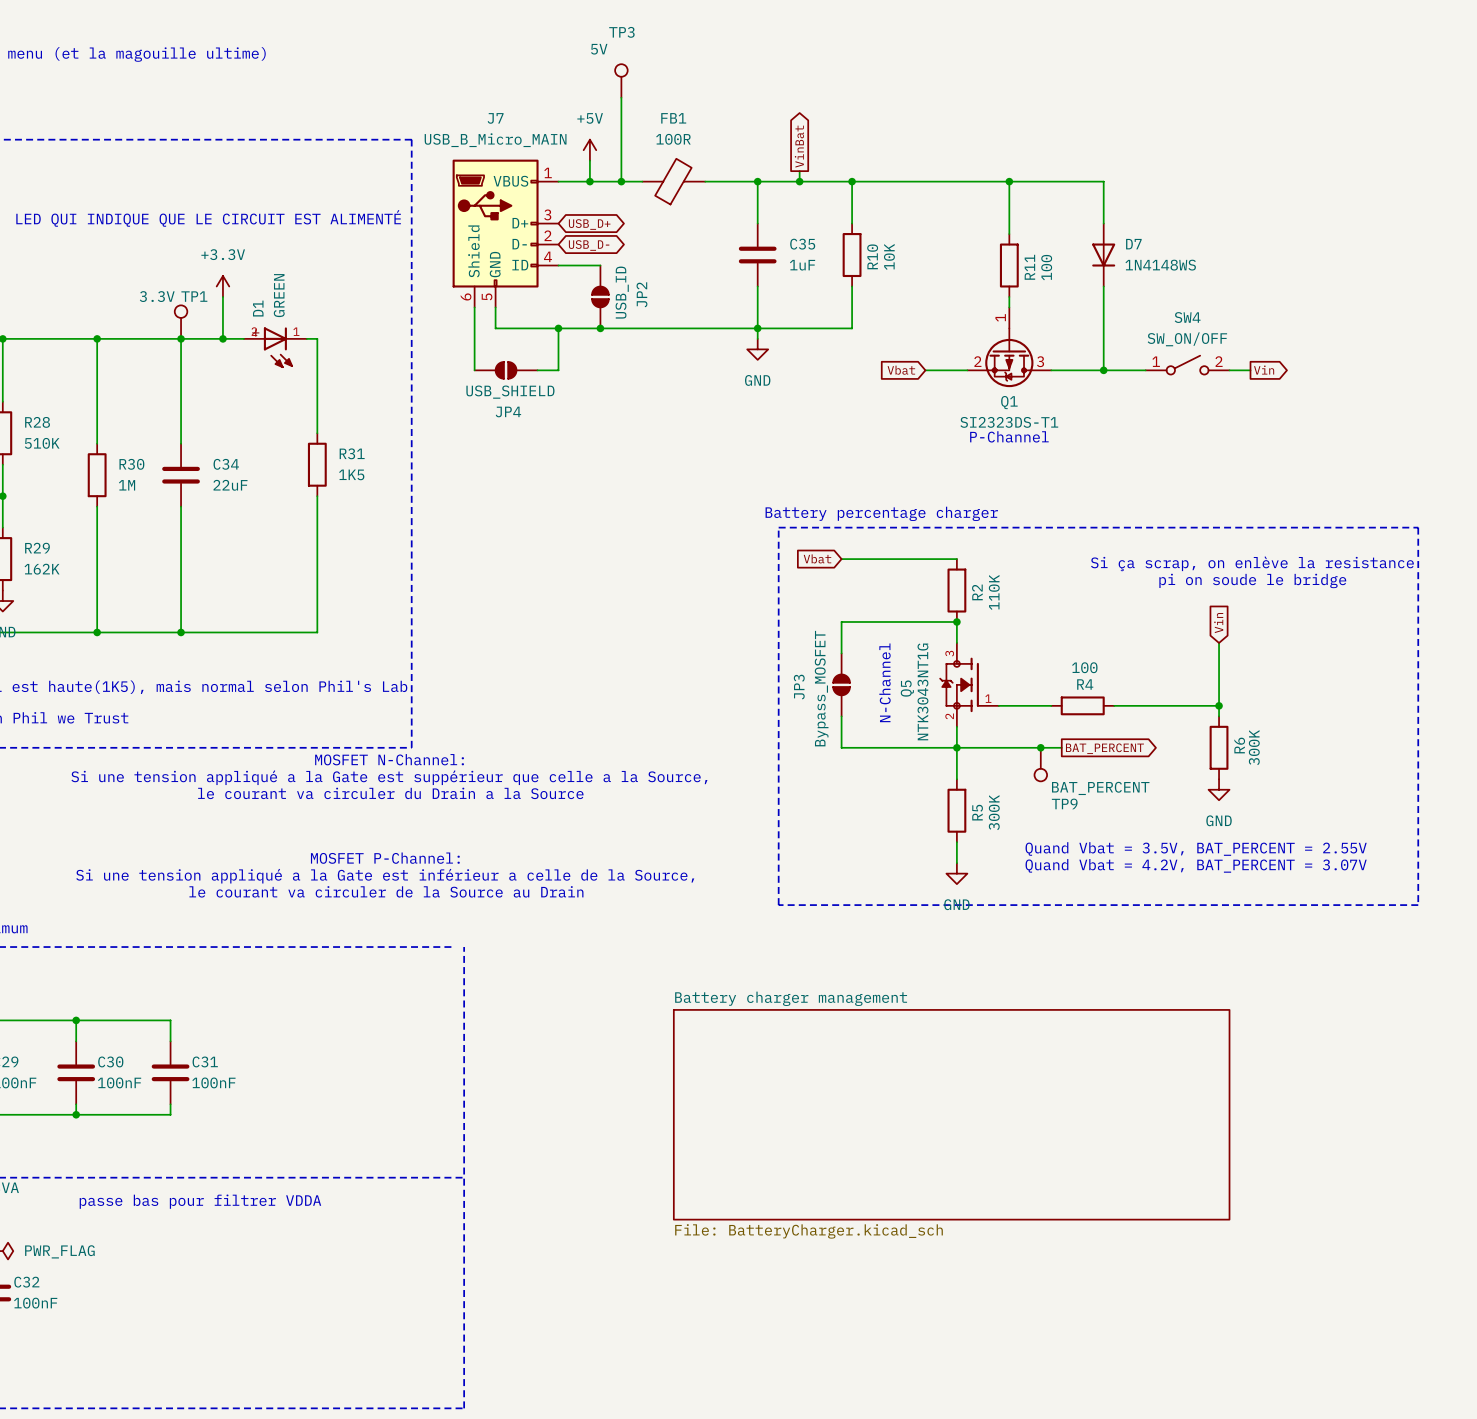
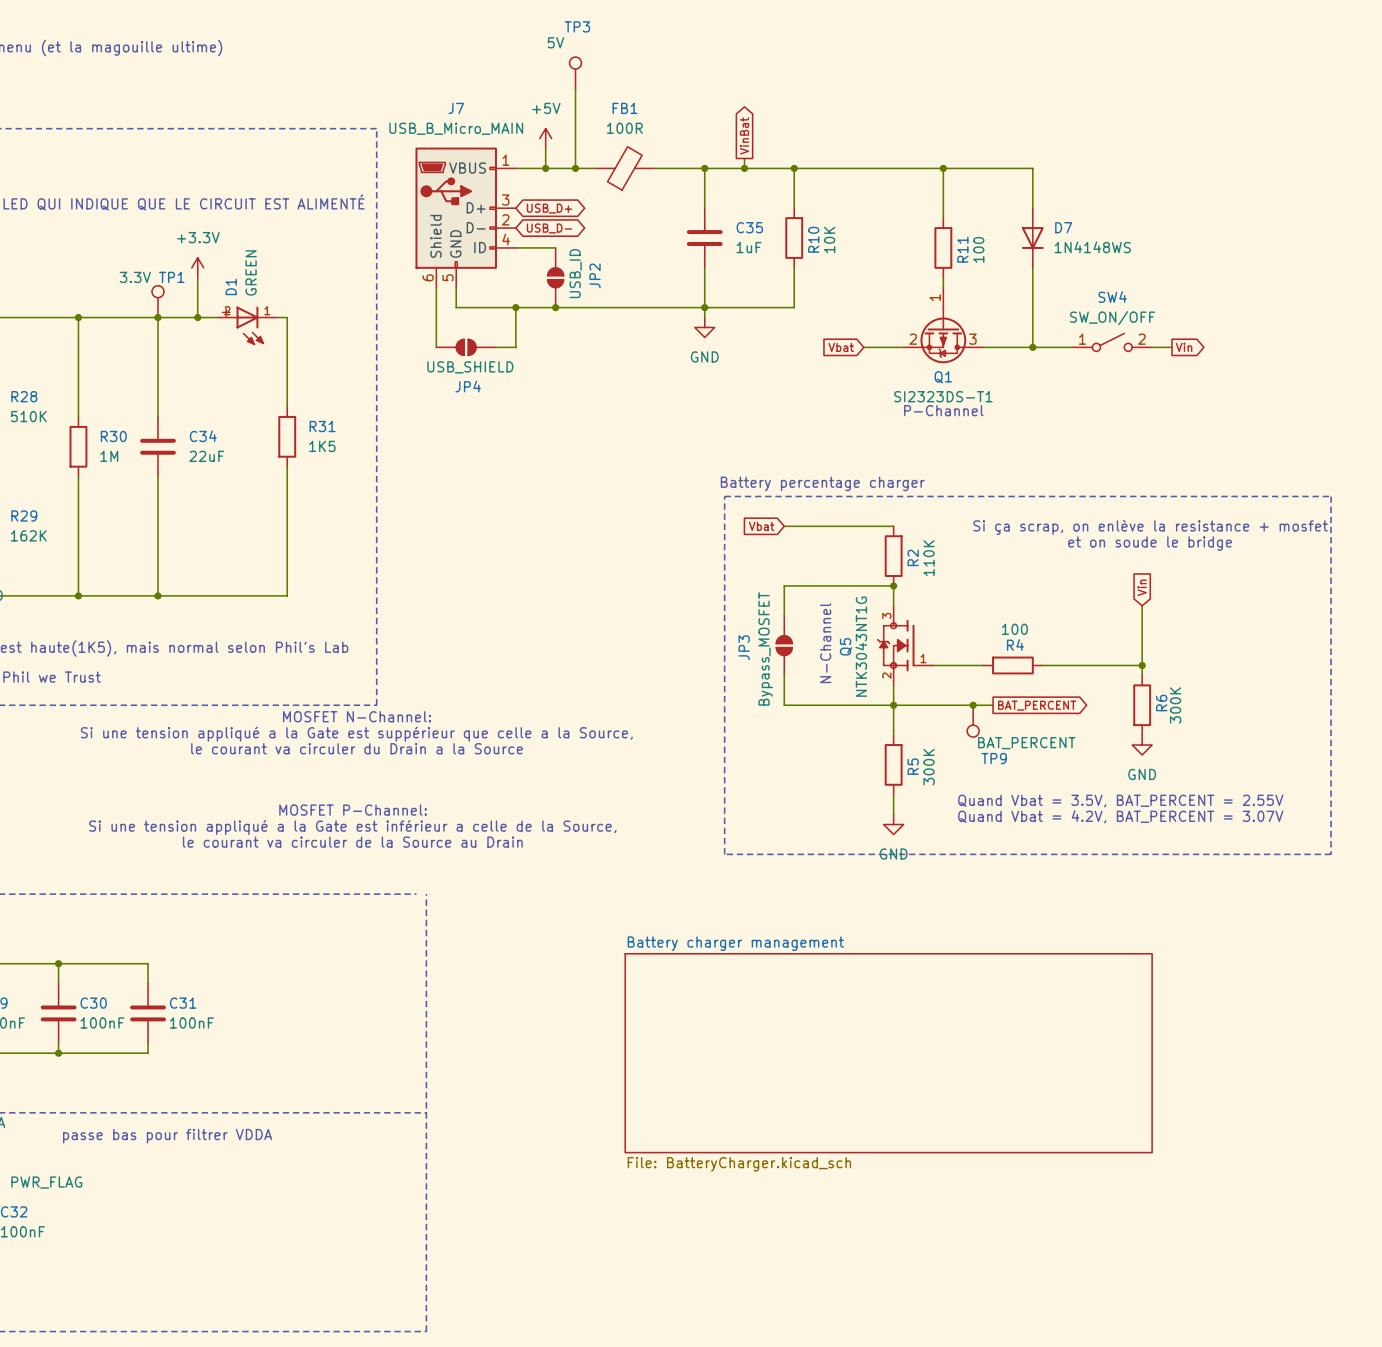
text: Si ça scrap, on enlève la resistance (1252, 563) -> Si ça scrap, on enlève la resistance + mosfet (1150, 527)
text: pi on soude le bridge (1252, 580) -> et on soude le bridge (1150, 543)

